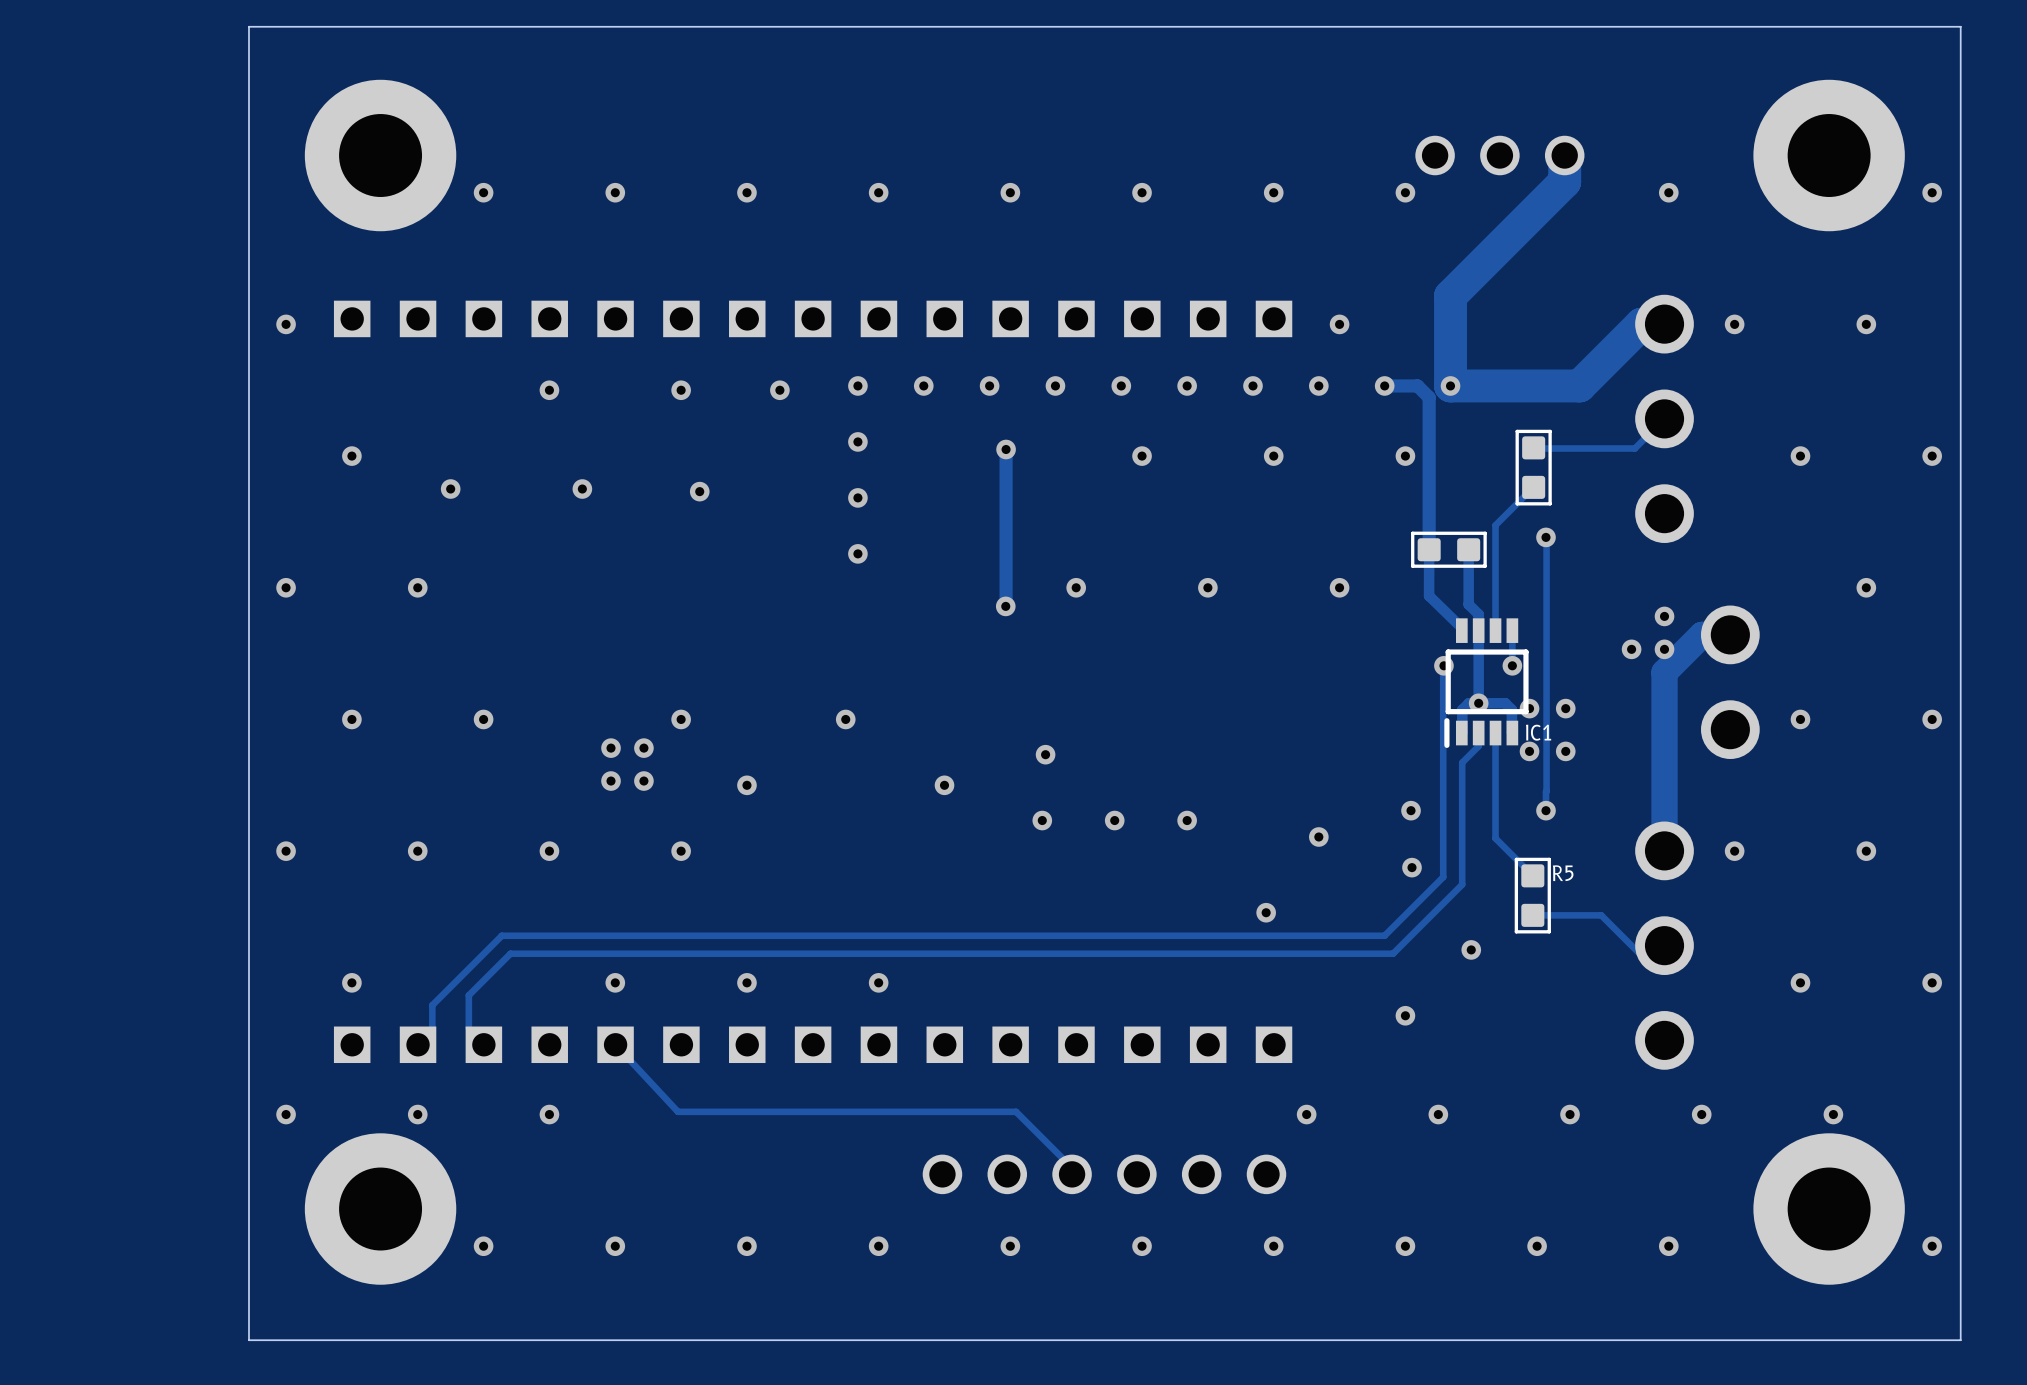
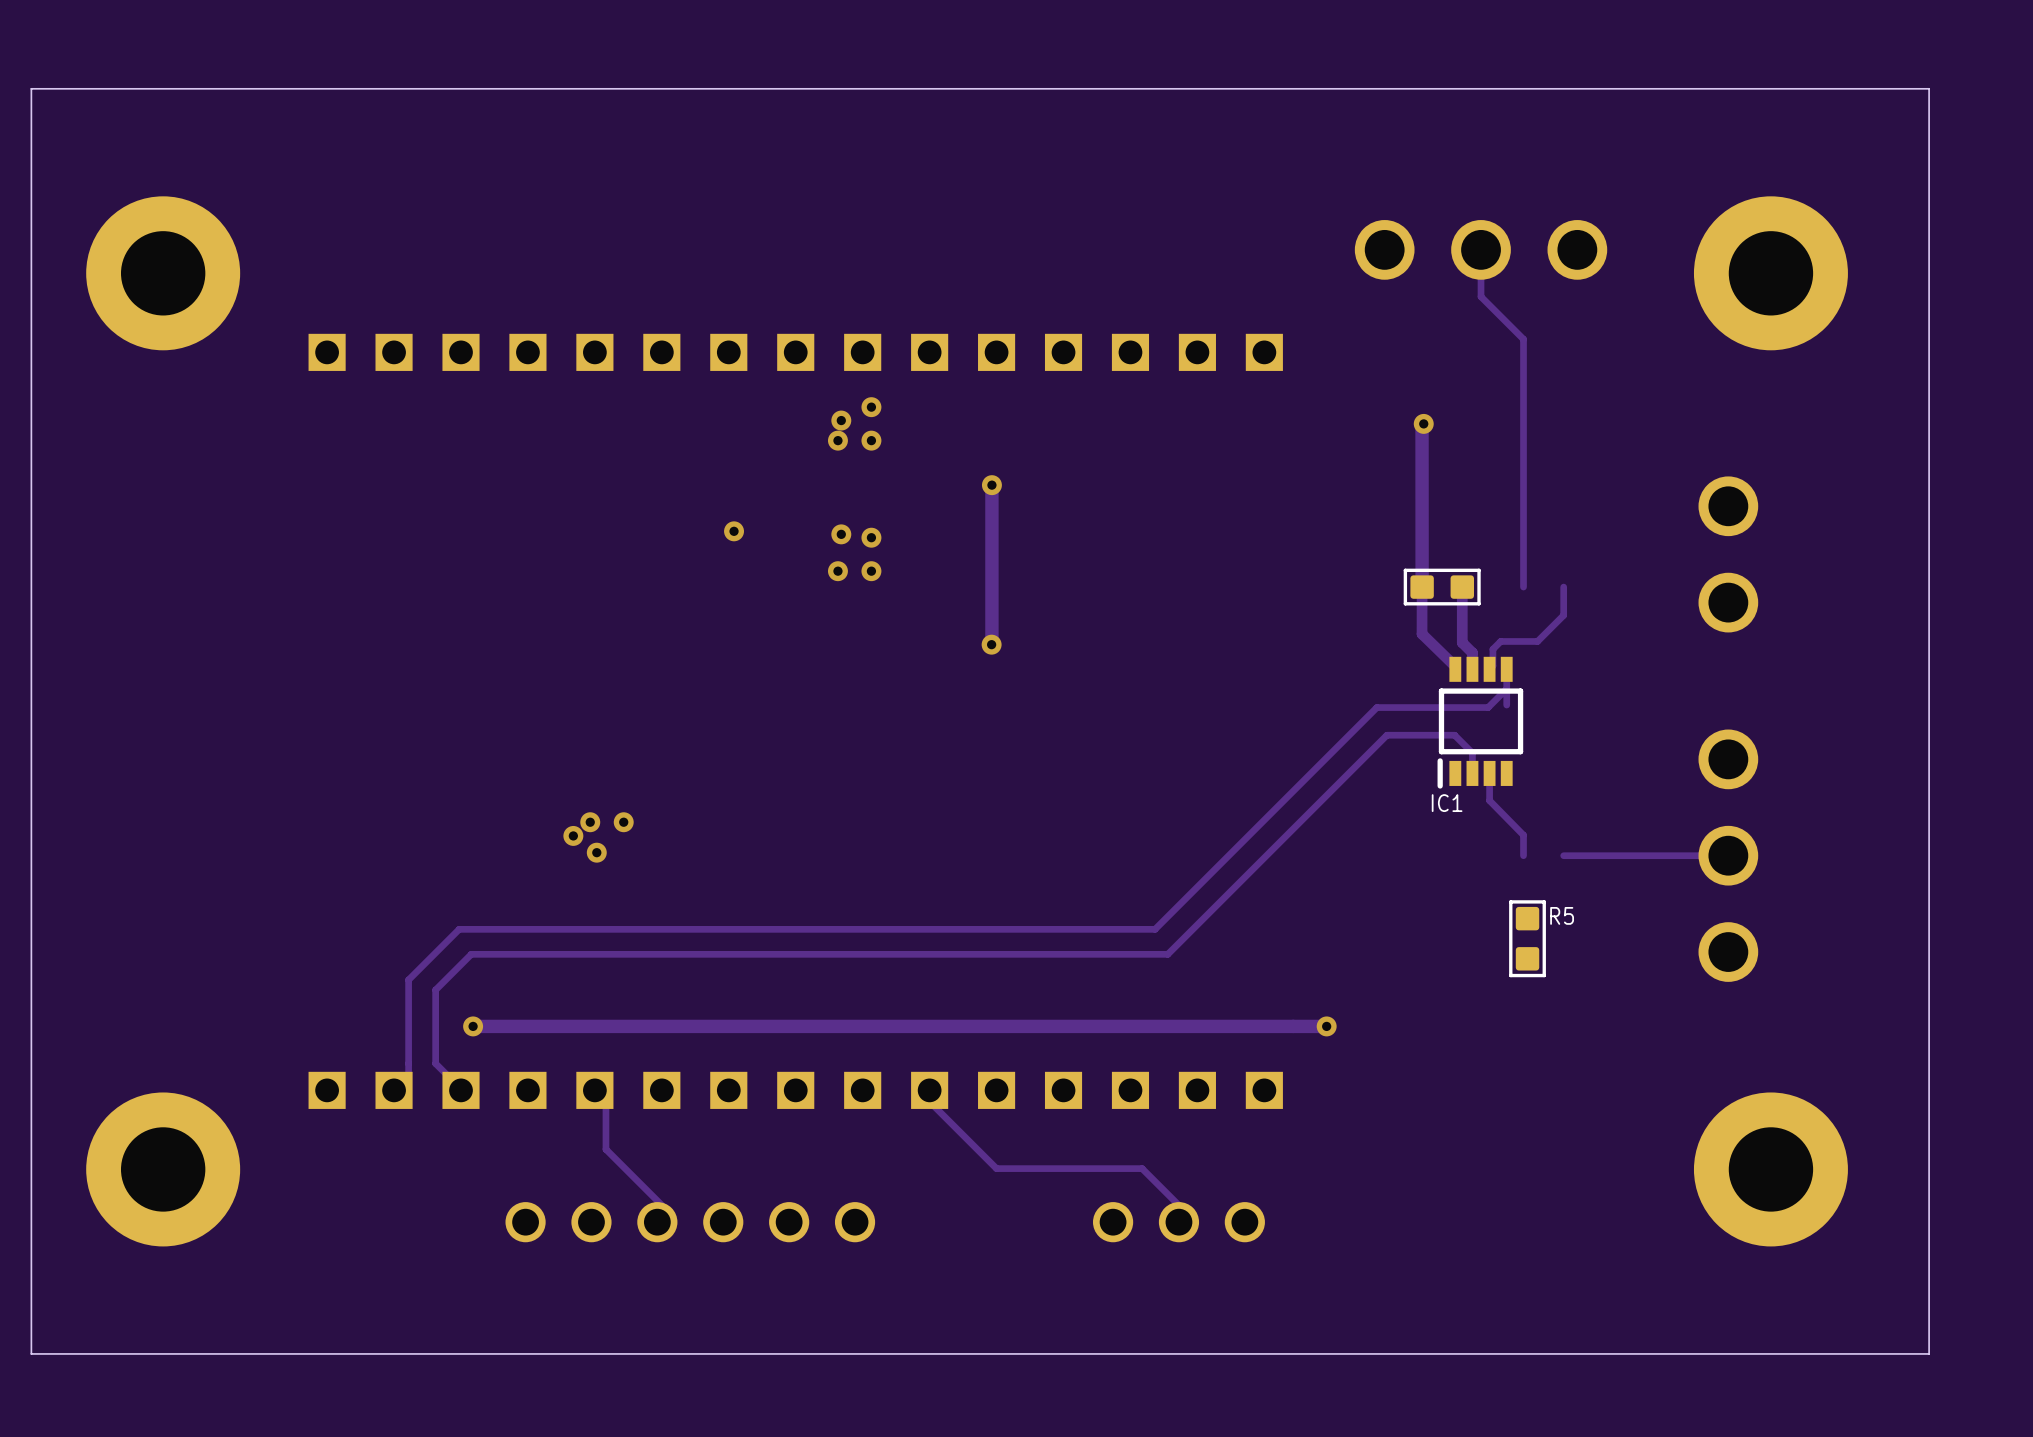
board edge: (1960, 26) (248, 26) (248, 1340) (1960, 1340) (1960, 26) -> (1929, 88) (1929, 1353) (31, 1353) (31, 88) (1929, 88)
part position: (380, 155) -> (163, 273)
part: (1499, 155) -> none
track: (1564, 155) (1564, 181) (1450, 296) (1450, 385) (1579, 385) (1641, 324) (1664, 324) -> none
part position: (1829, 155) -> (1770, 273)
via: (483, 192) -> none
via: (615, 192) -> none
via: (746, 192) -> none
via: (878, 192) -> none
via: (1010, 192) -> none
via: (1142, 192) -> none
via: (1273, 192) -> none
via: (1405, 192) -> none
via: (1668, 192) -> none
via: (1932, 192) -> none
track: none -> (1481, 249) (1481, 296) (1523, 339) (1523, 587)
part: none -> (1481, 249)
via: (286, 324) -> none
via: (1339, 324) -> none
via: (1734, 324) -> none
via: (1866, 324) -> none
via: none -> (871, 407)
via: (923, 385) -> none
via: (989, 385) -> none
via: (1055, 385) -> none
via: (1121, 385) -> none
via: (1187, 385) -> none
via: (1252, 385) -> none
via: (1318, 385) -> none
track: (1384, 385) (1417, 385) (1429, 397) (1429, 549) -> (1423, 423) (1422, 425) (1422, 587)
via: (1384, 385) -> none
via position: (1450, 385) -> (1423, 423)
via: (549, 390) -> none
via: (681, 390) -> none
via: (779, 390) -> none
via: none -> (837, 440)
via: none -> (871, 440)
track: (1664, 418) (1634, 448) (1533, 447) -> none
part: (1664, 418) -> none
via: (857, 441) -> none
via: (351, 456) -> none
via: (1142, 456) -> none
via: (1273, 456) -> none
via: (1405, 456) -> none
via: (1800, 456) -> none
via: (1932, 456) -> none
part: (1533, 467) -> none
track: (1533, 487) (1495, 525) (1495, 630) -> (1563, 587) (1563, 615) (1537, 641) (1500, 641) (1492, 649) (1492, 665) (1489, 669)
via: (450, 489) -> none
via: (582, 489) -> none
via position: (699, 491) -> (734, 531)
via: none -> (871, 537)
via: none -> (837, 571)
via: none -> (871, 571)
track: (1545, 537) (1545, 810) -> none
via: (1545, 537) -> none
via: (857, 553) -> none
via: (286, 587) -> none
via: (417, 587) -> none
via: (1076, 587) -> none
via: (1207, 587) -> none
via: (1339, 587) -> none
via: (1866, 587) -> none
via: (1664, 616) -> none
track: (1478, 630) (1478, 703) -> none
track: (1730, 634) (1702, 634) (1664, 672) (1664, 850) -> none
via: (1631, 649) -> none
via: (1664, 649) -> none
track: (1443, 665) (1443, 877) (1384, 935) (501, 935) (432, 1005) -> (1506, 688) (1488, 707) (1376, 707) (1155, 929) (459, 929) (408, 979) (408, 1050)
via: (1443, 665) -> none
via: (1512, 665) -> none
part position: (1730, 682) -> (1728, 554)
via: (1478, 703) -> none
via: (1529, 708) -> none
via: (1565, 708) -> none
via: (351, 719) -> none
via: (483, 719) -> none
via: (681, 719) -> none
via: (845, 719) -> none
via: (1800, 719) -> none
via: (1932, 719) -> none
IC1 name position: IC1 (1538, 732) -> IC1 (1447, 803)
track: (1478, 733) (1478, 746) (1462, 762) (1462, 884) (1393, 953) (510, 953) (468, 995) (468, 1028) -> (1472, 773) (1472, 753) (1454, 735) (1386, 735) (1167, 954) (471, 954) (435, 989) (435, 1063) (445, 1073)
track: (1512, 733) (1511, 709) (1505, 703) (1468, 703) (1462, 709) (1461, 733) -> none
via: (611, 748) -> none
via: (643, 748) -> none
via: (1529, 751) -> none
via: (1565, 751) -> none
via: (1045, 754) -> none
track: (1495, 759) (1495, 838) (1532, 875) -> (1489, 800) (1523, 835) (1523, 855)
via: (746, 785) -> none
via: (944, 785) -> none
via: none -> (573, 835)
via: none -> (596, 852)
via: (1411, 810) -> none
via: (1545, 810) -> none
track: none -> (1728, 855) (1563, 855)
via: (1042, 820) -> none
via: (1114, 820) -> none
via: (1187, 820) -> none
via: (1318, 837) -> none
via: (286, 851) -> none
via: (417, 851) -> none
via: (549, 851) -> none
via: (681, 851) -> none
via: (1734, 851) -> none
via: (1866, 851) -> none
via: (1412, 867) -> none
via: (1266, 912) -> none
track: (1532, 915) (1601, 915) (1641, 955) (1654, 955) (1664, 945) -> none
part position: (1664, 945) -> (1728, 855)
via: (1471, 949) -> none
via: none -> (473, 1026)
track: none -> (1326, 1026) (473, 1026)
via: none -> (1326, 1026)
via: (351, 982) -> none
via: (615, 982) -> none
via: (746, 982) -> none
via: (878, 982) -> none
via: (1800, 982) -> none
via: (1932, 982) -> none
via: (1405, 1015) -> none
track: none -> (590, 1090) (605, 1106) (605, 1149) (664, 1207) (664, 1215) (657, 1222)
track: (615, 1044) (677, 1111) (1016, 1111) (1072, 1167) (1072, 1174) -> none
track: none -> (926, 1090) (926, 1098) (996, 1168) (1142, 1168) (1178, 1205) (1178, 1222)
via: (286, 1114) -> none
via: (417, 1114) -> none
via: (549, 1114) -> none
via: (1306, 1114) -> none
via: (1438, 1114) -> none
via: (1570, 1114) -> none
via: (1701, 1114) -> none
via: (1833, 1114) -> none
part position: (1104, 1174) -> (690, 1222)
part: none -> (1178, 1222)
part position: (380, 1209) -> (163, 1169)
part position: (1829, 1209) -> (1770, 1169)
via: (483, 1246) -> none
via: (615, 1246) -> none
via: (746, 1246) -> none
via: (878, 1246) -> none
via: (1010, 1246) -> none
via: (1142, 1246) -> none
via: (1273, 1246) -> none
via: (1405, 1246) -> none
via: (1537, 1246) -> none
via: (1668, 1246) -> none
via: (1932, 1246) -> none

